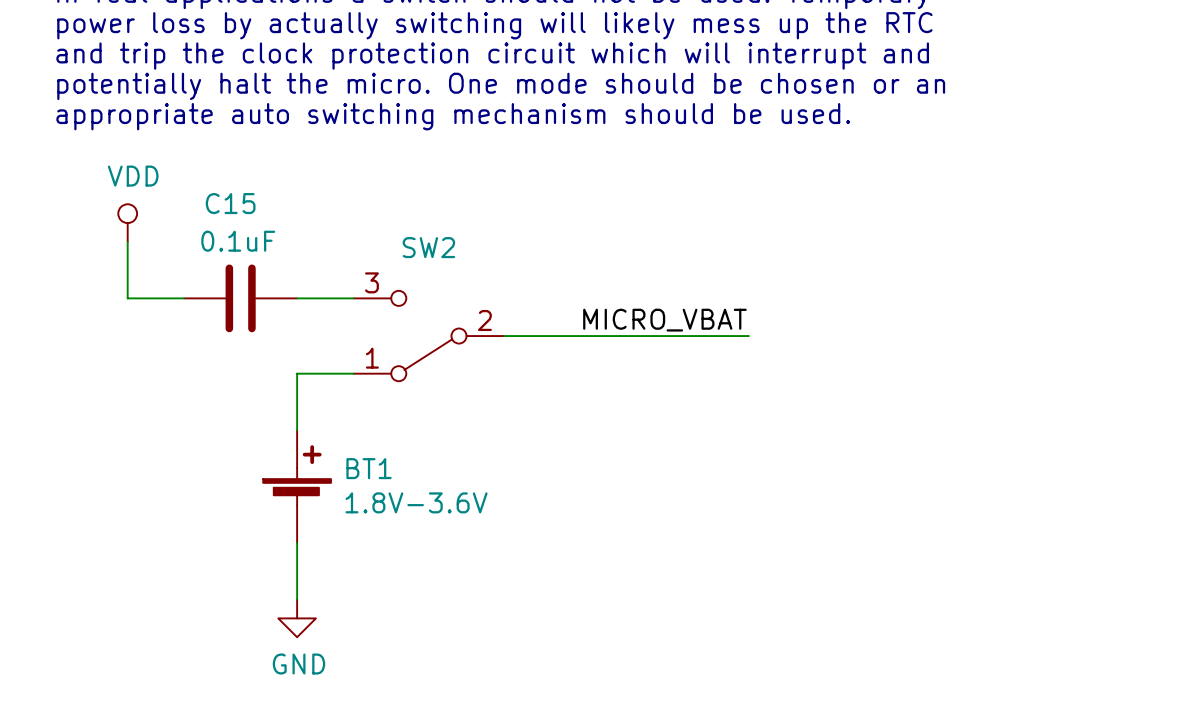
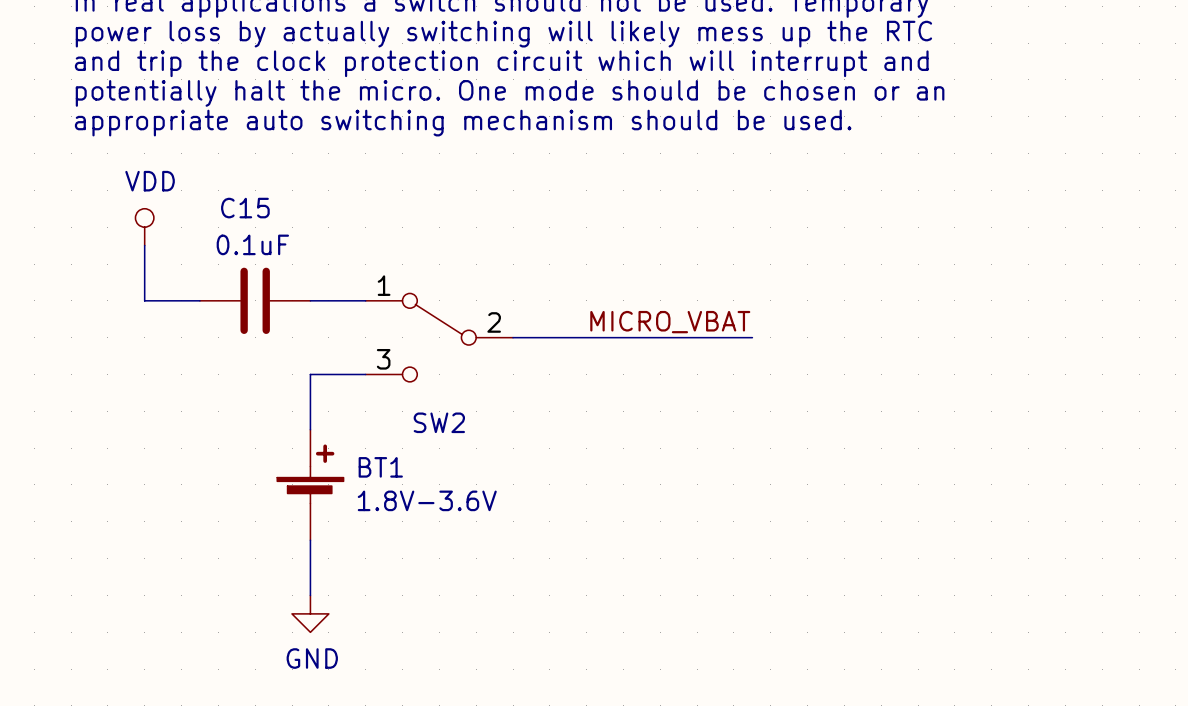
SW2 flip: as is (428, 336) -> up-down (439, 337)

